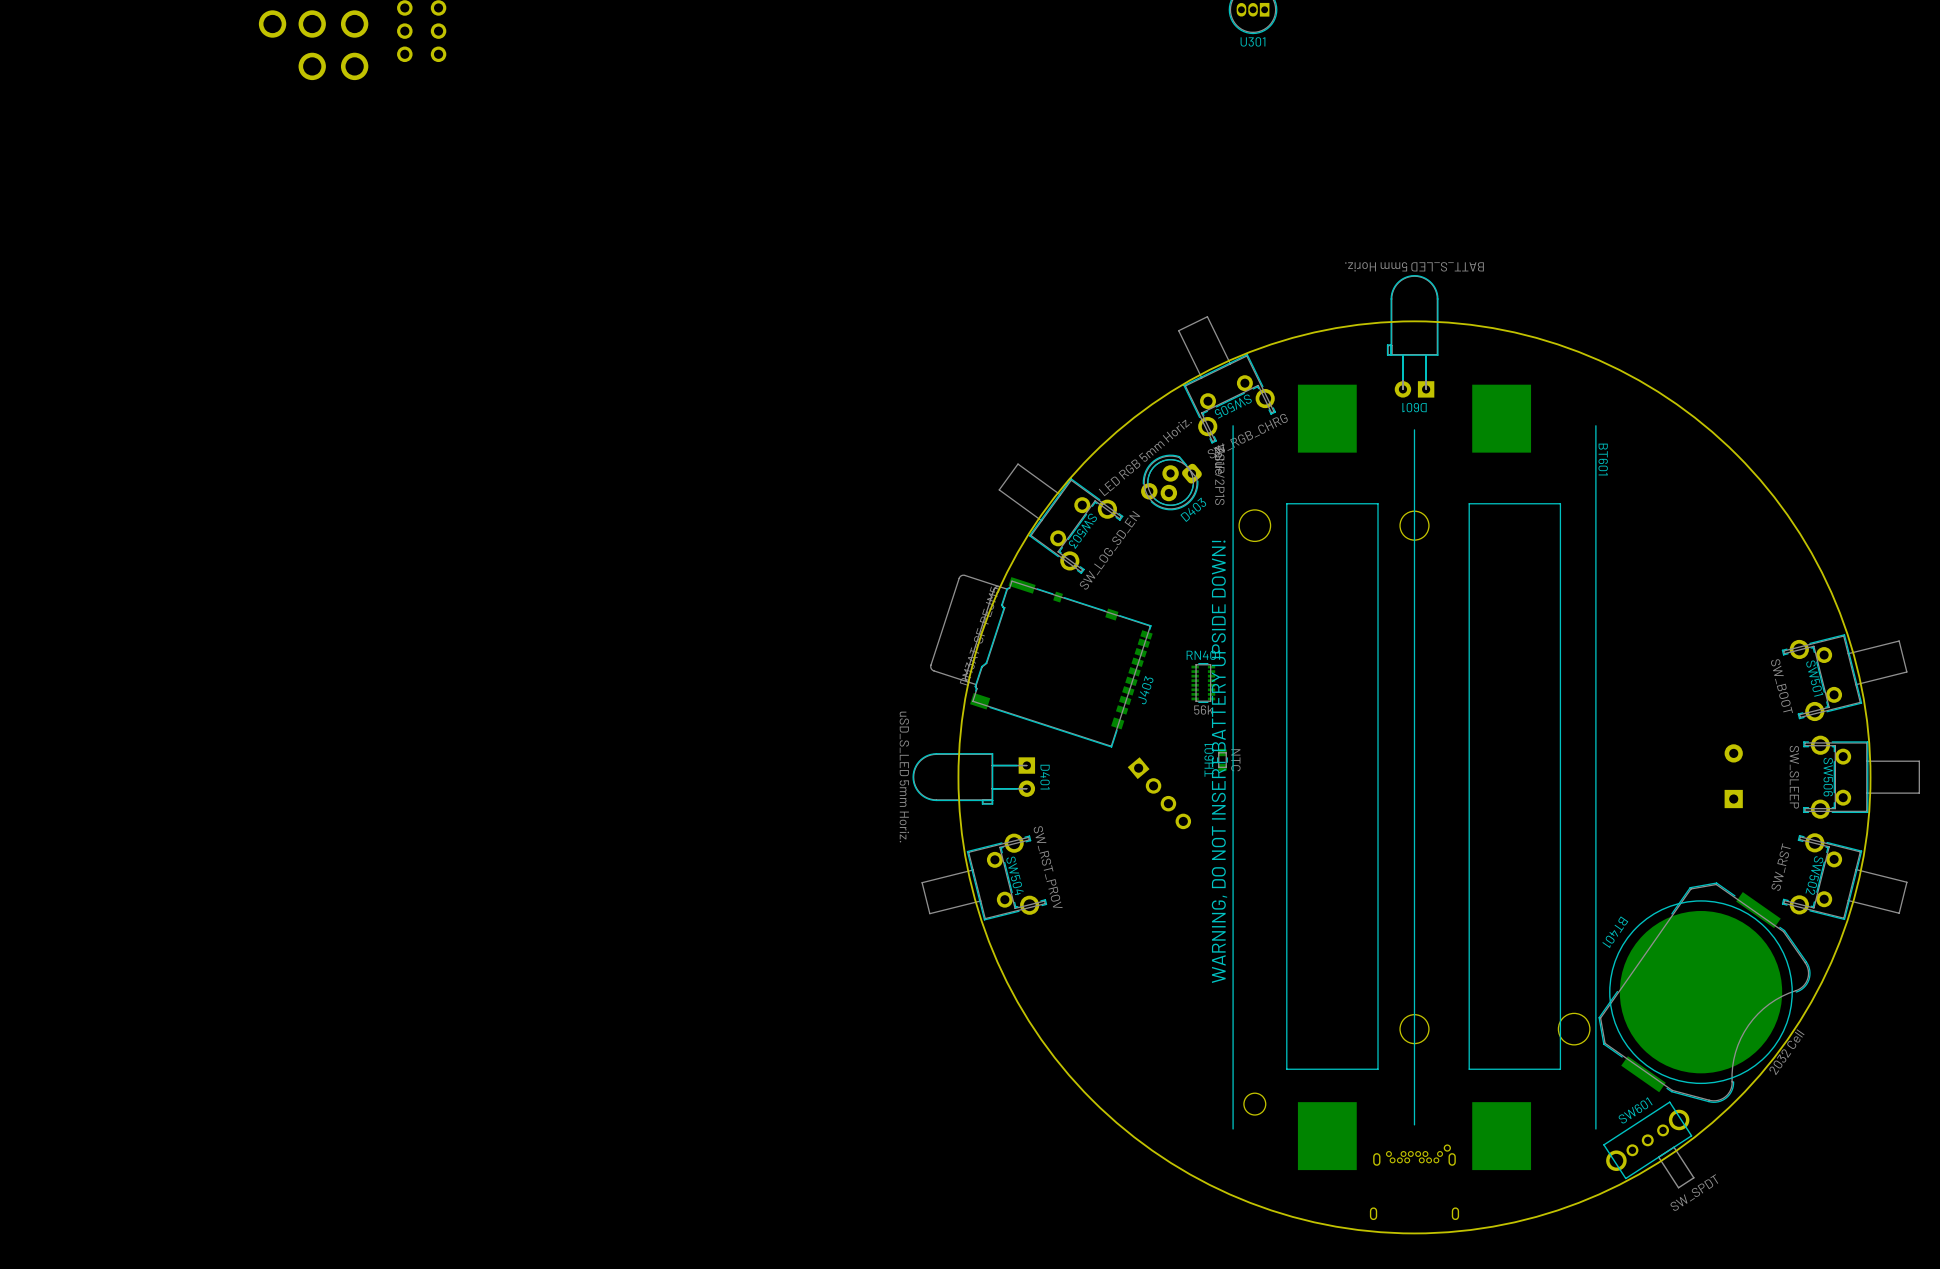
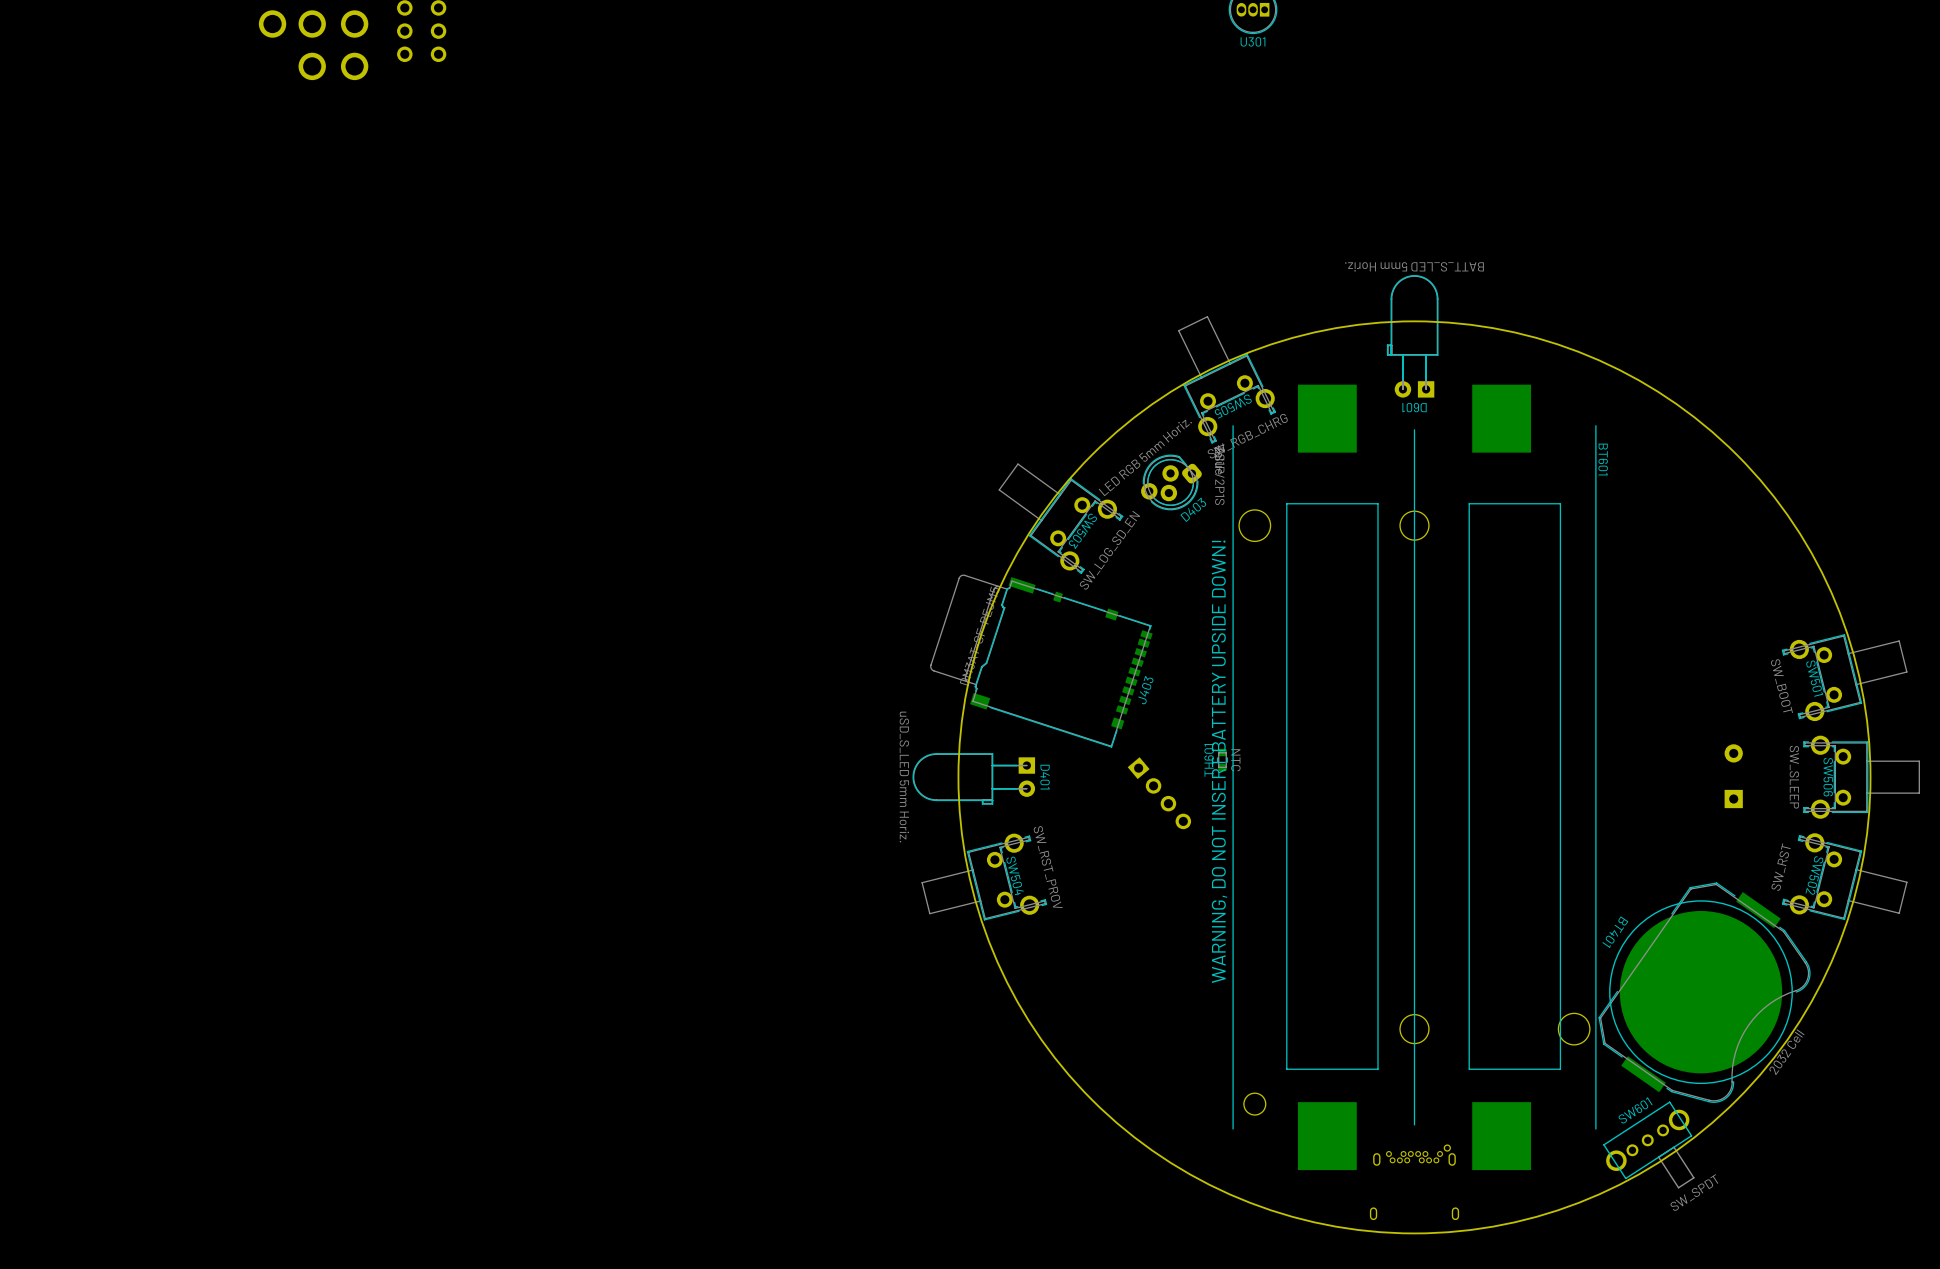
RN401: 56k (1203, 682) -> none

